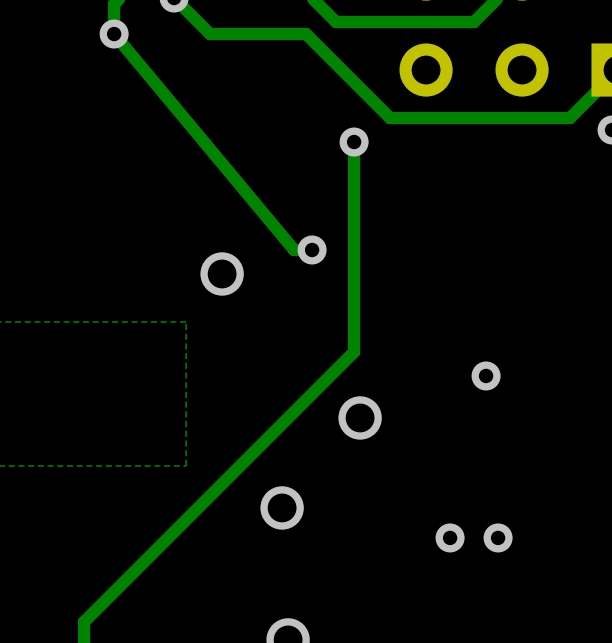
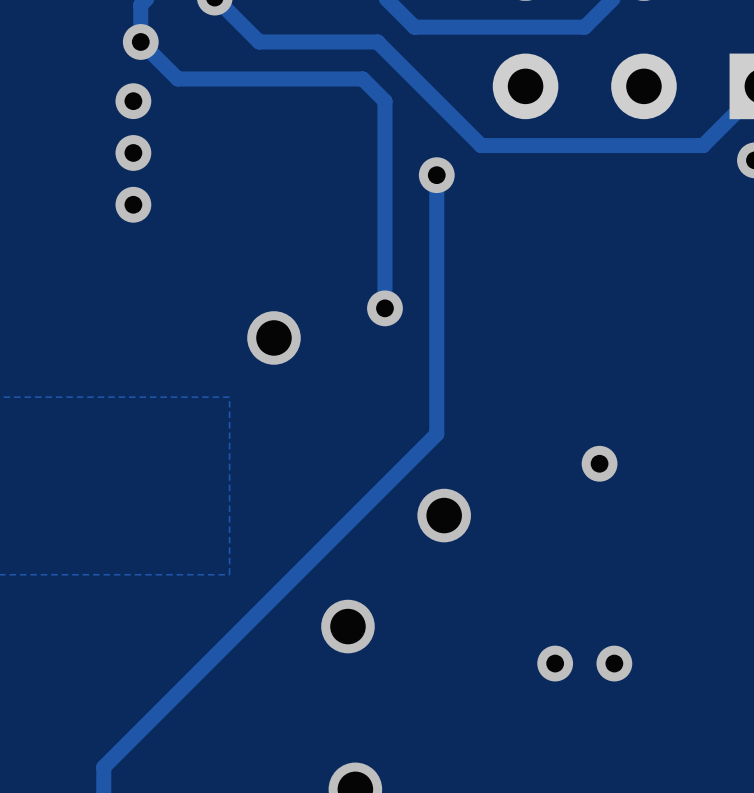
track: (114, 34) (294, 249) (312, 249) -> (140, 41) (177, 78) (362, 78) (384, 101) (384, 308)
via: none -> (133, 101)
via: none -> (133, 152)
via: none -> (133, 204)

